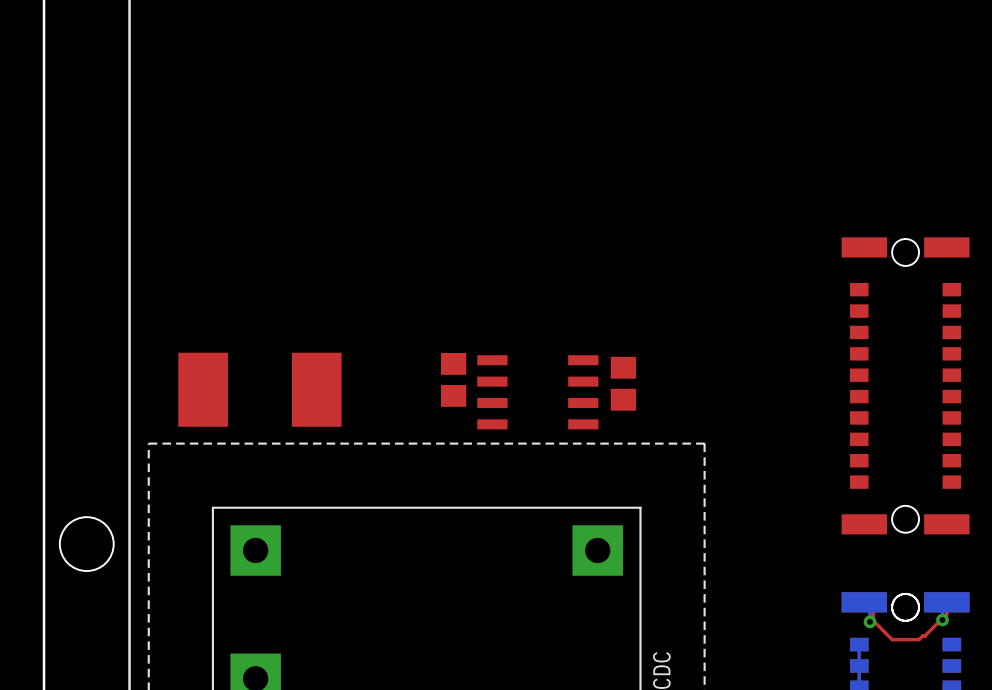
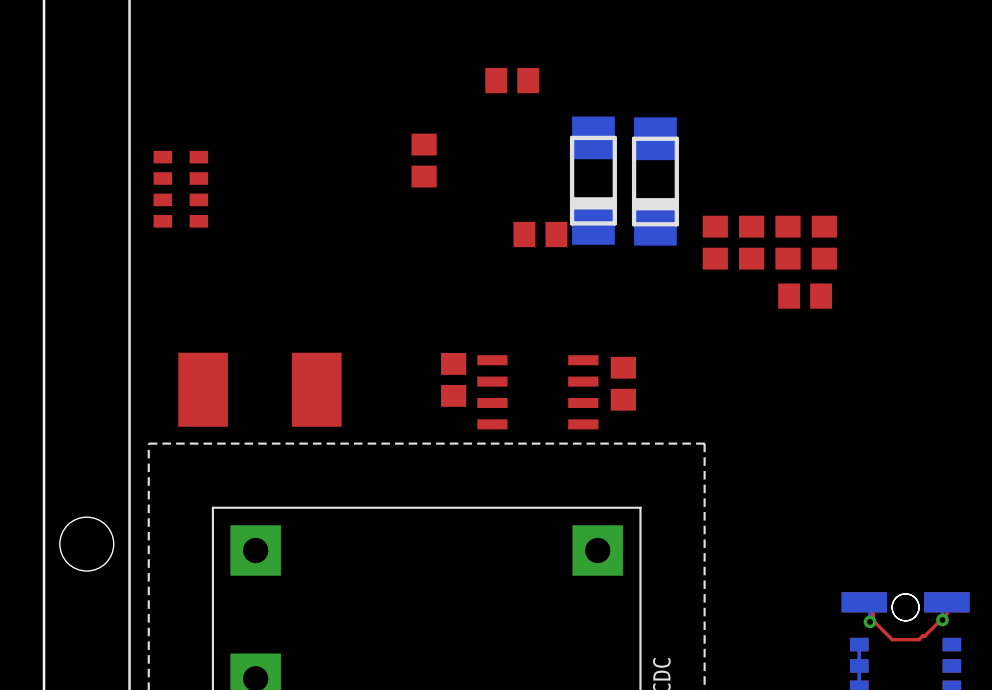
part: none -> (512, 80)
part: none -> (424, 160)
part: none -> (593, 180)
part: none -> (655, 181)
part: none -> (180, 189)
part: none -> (540, 234)
part: none -> (715, 242)
part: none -> (751, 242)
part: none -> (787, 242)
part: none -> (824, 242)
part: none -> (805, 296)
part: (905, 385) -> none

